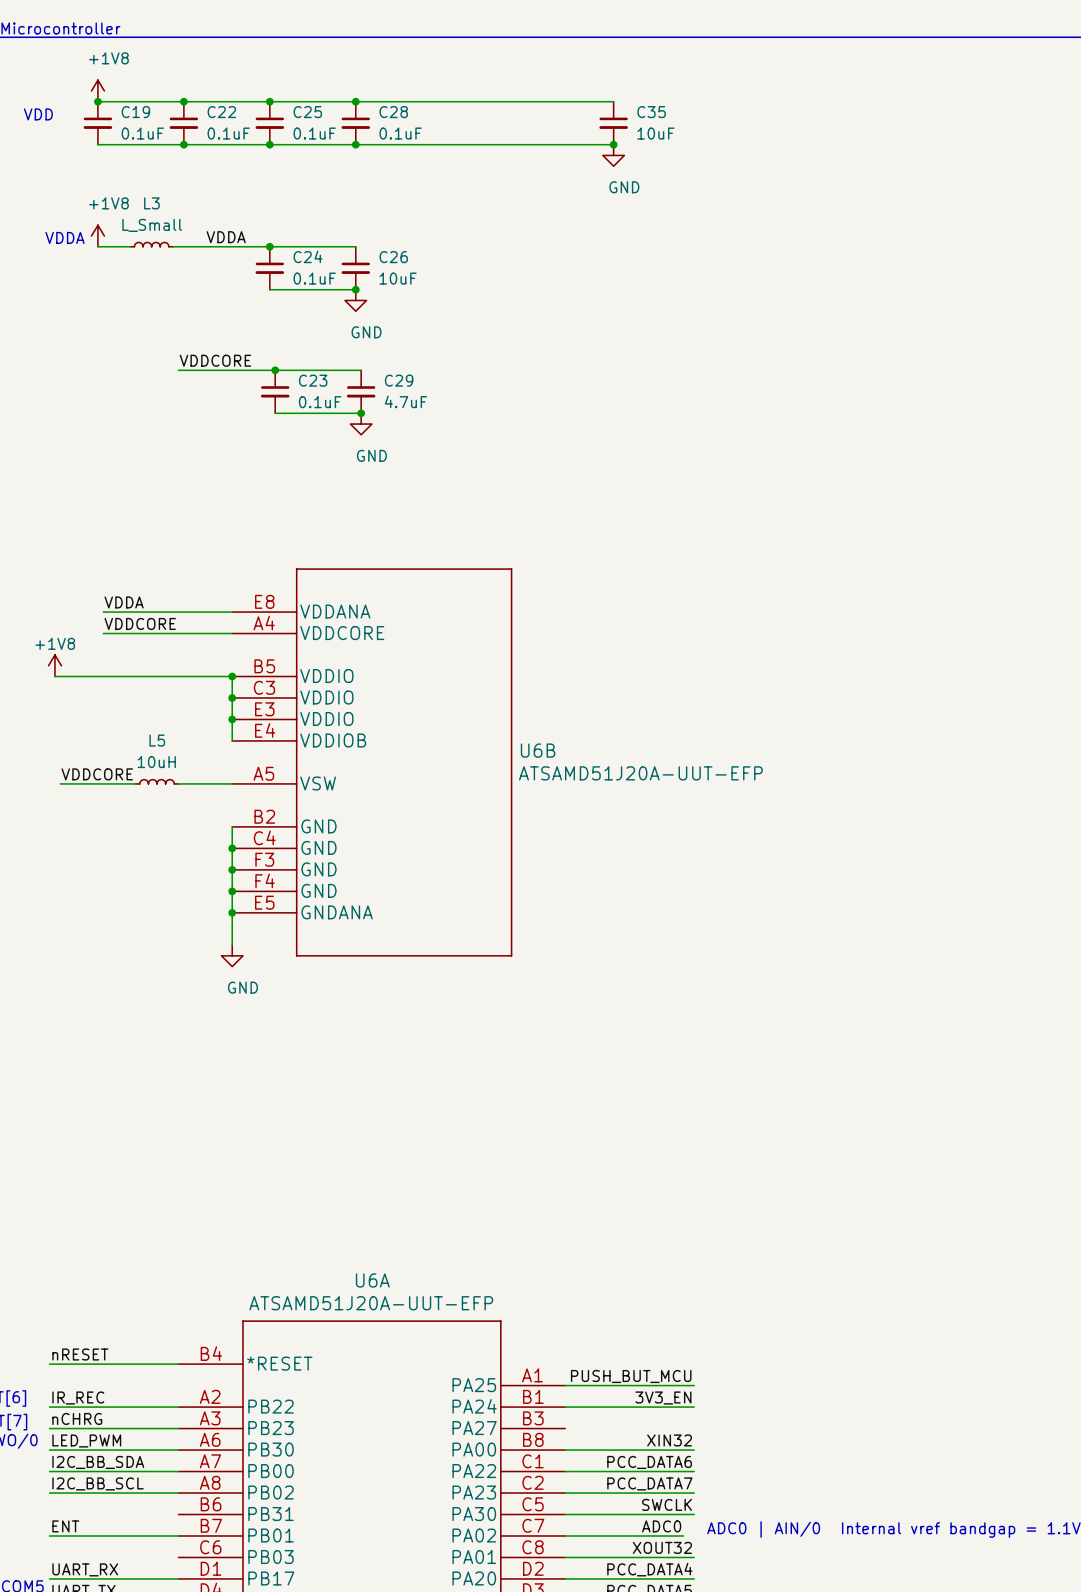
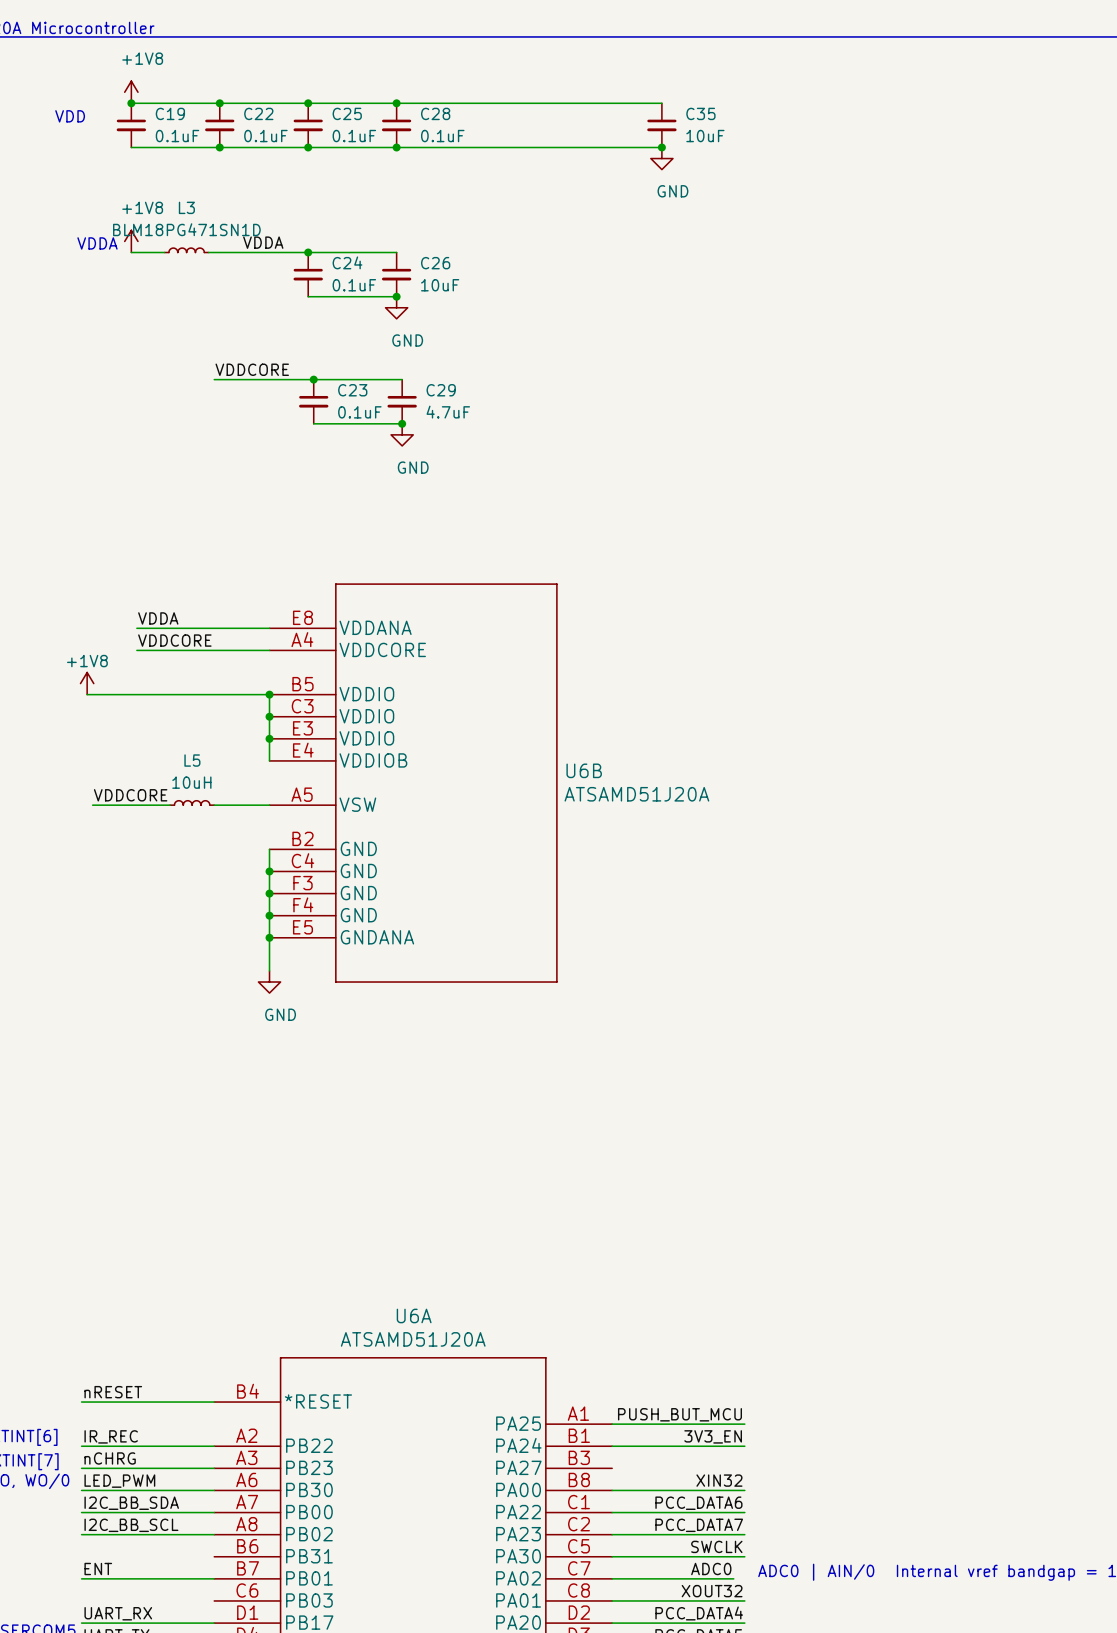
L3 value: L_Small (152, 225) -> BLM18PG471SN1D (186, 229)
U6B value: ATSAMD51J20A-UUT-EFP (640, 773) -> ATSAMD51J20A (636, 794)
U6A value: ATSAMD51J20A-UUT-EFP (371, 1303) -> ATSAMD51J20A (413, 1339)

